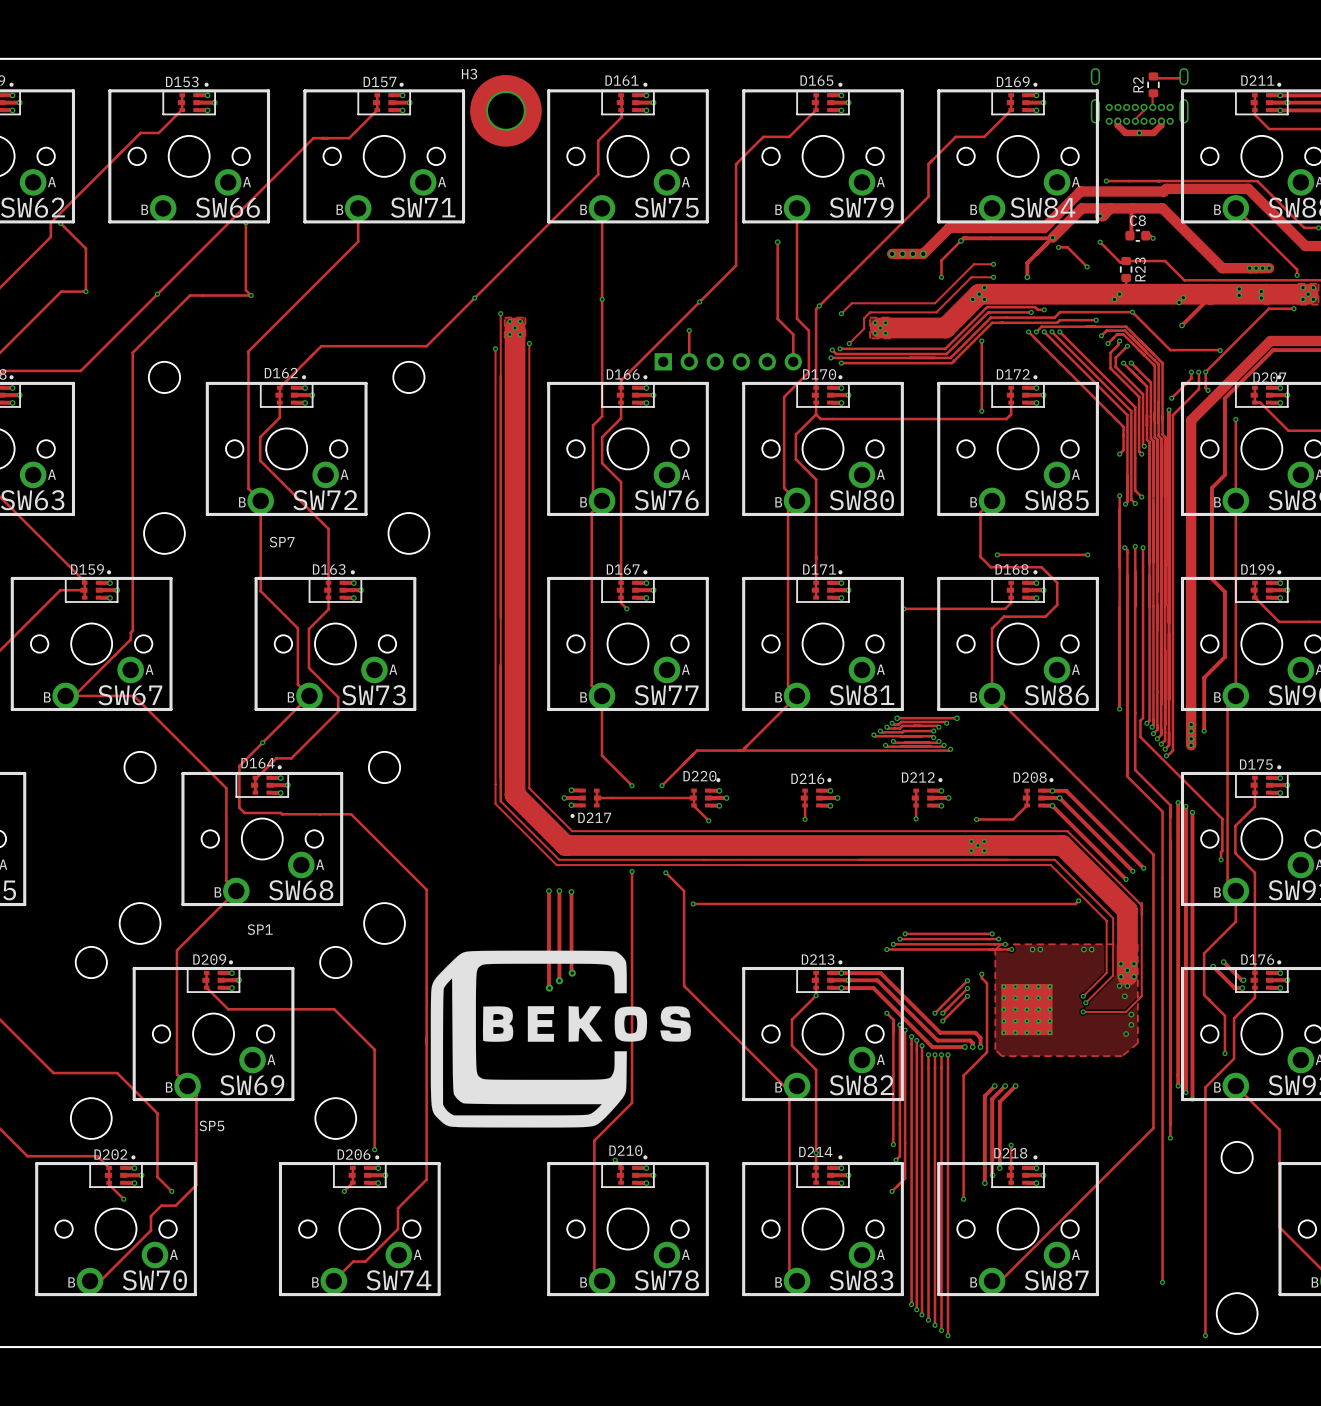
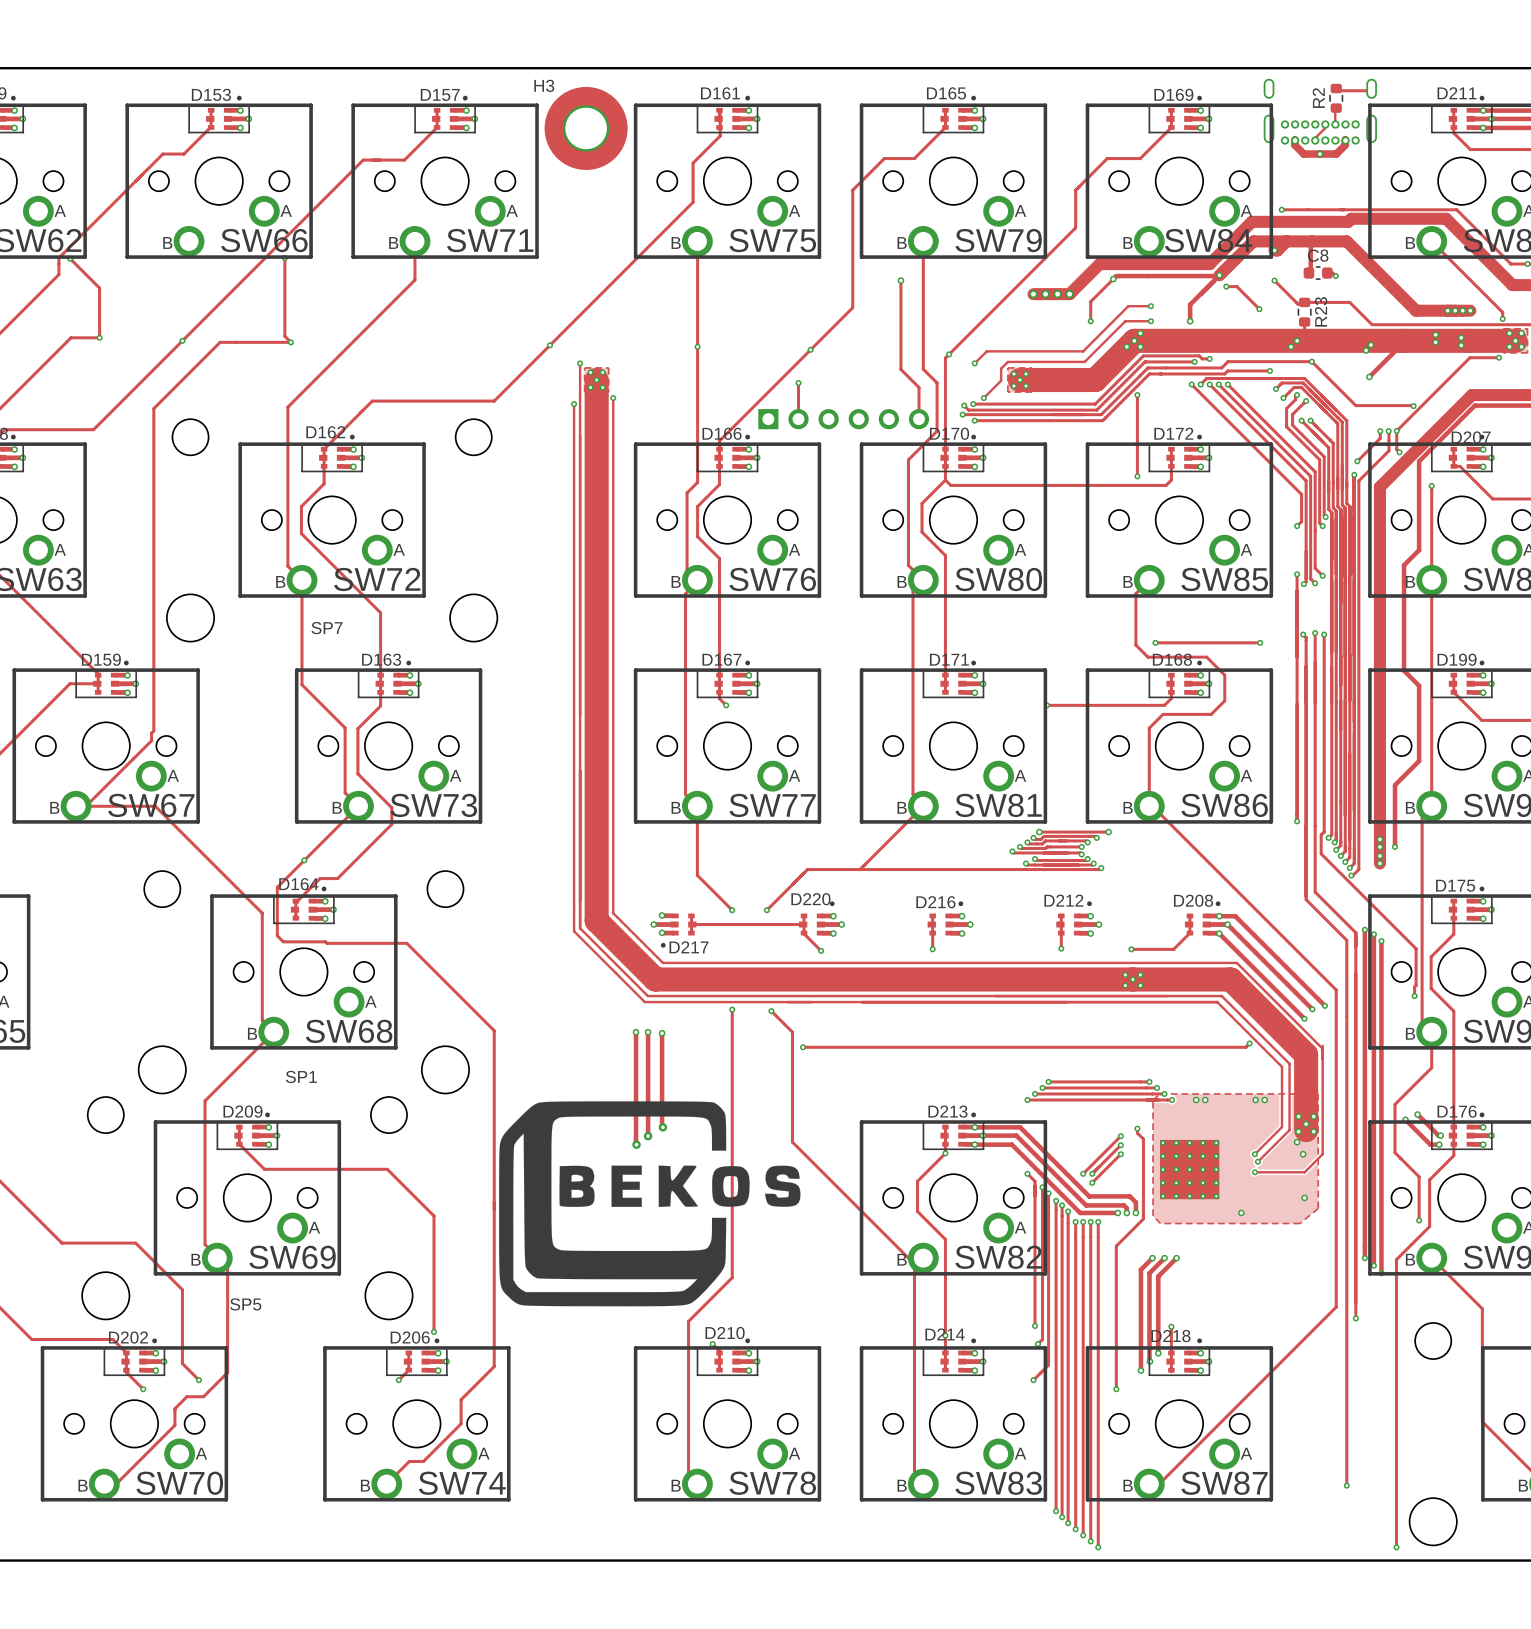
via: (1127, 985) -> none
via: (1131, 1014) -> none
via: (1131, 1024) -> none
via: none -> (1241, 1212)

